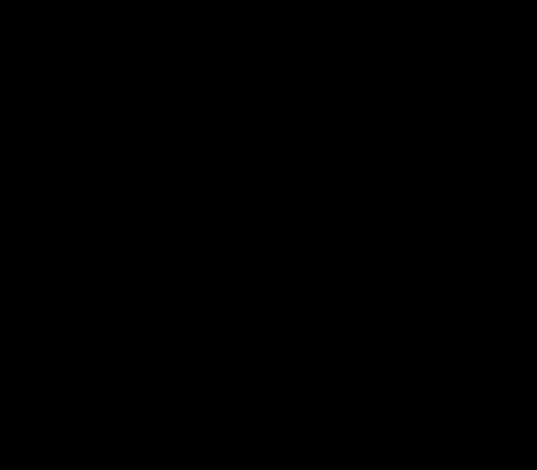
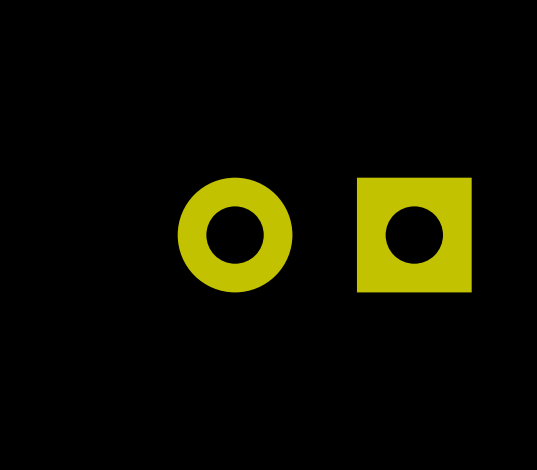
part: none -> (324, 235)

